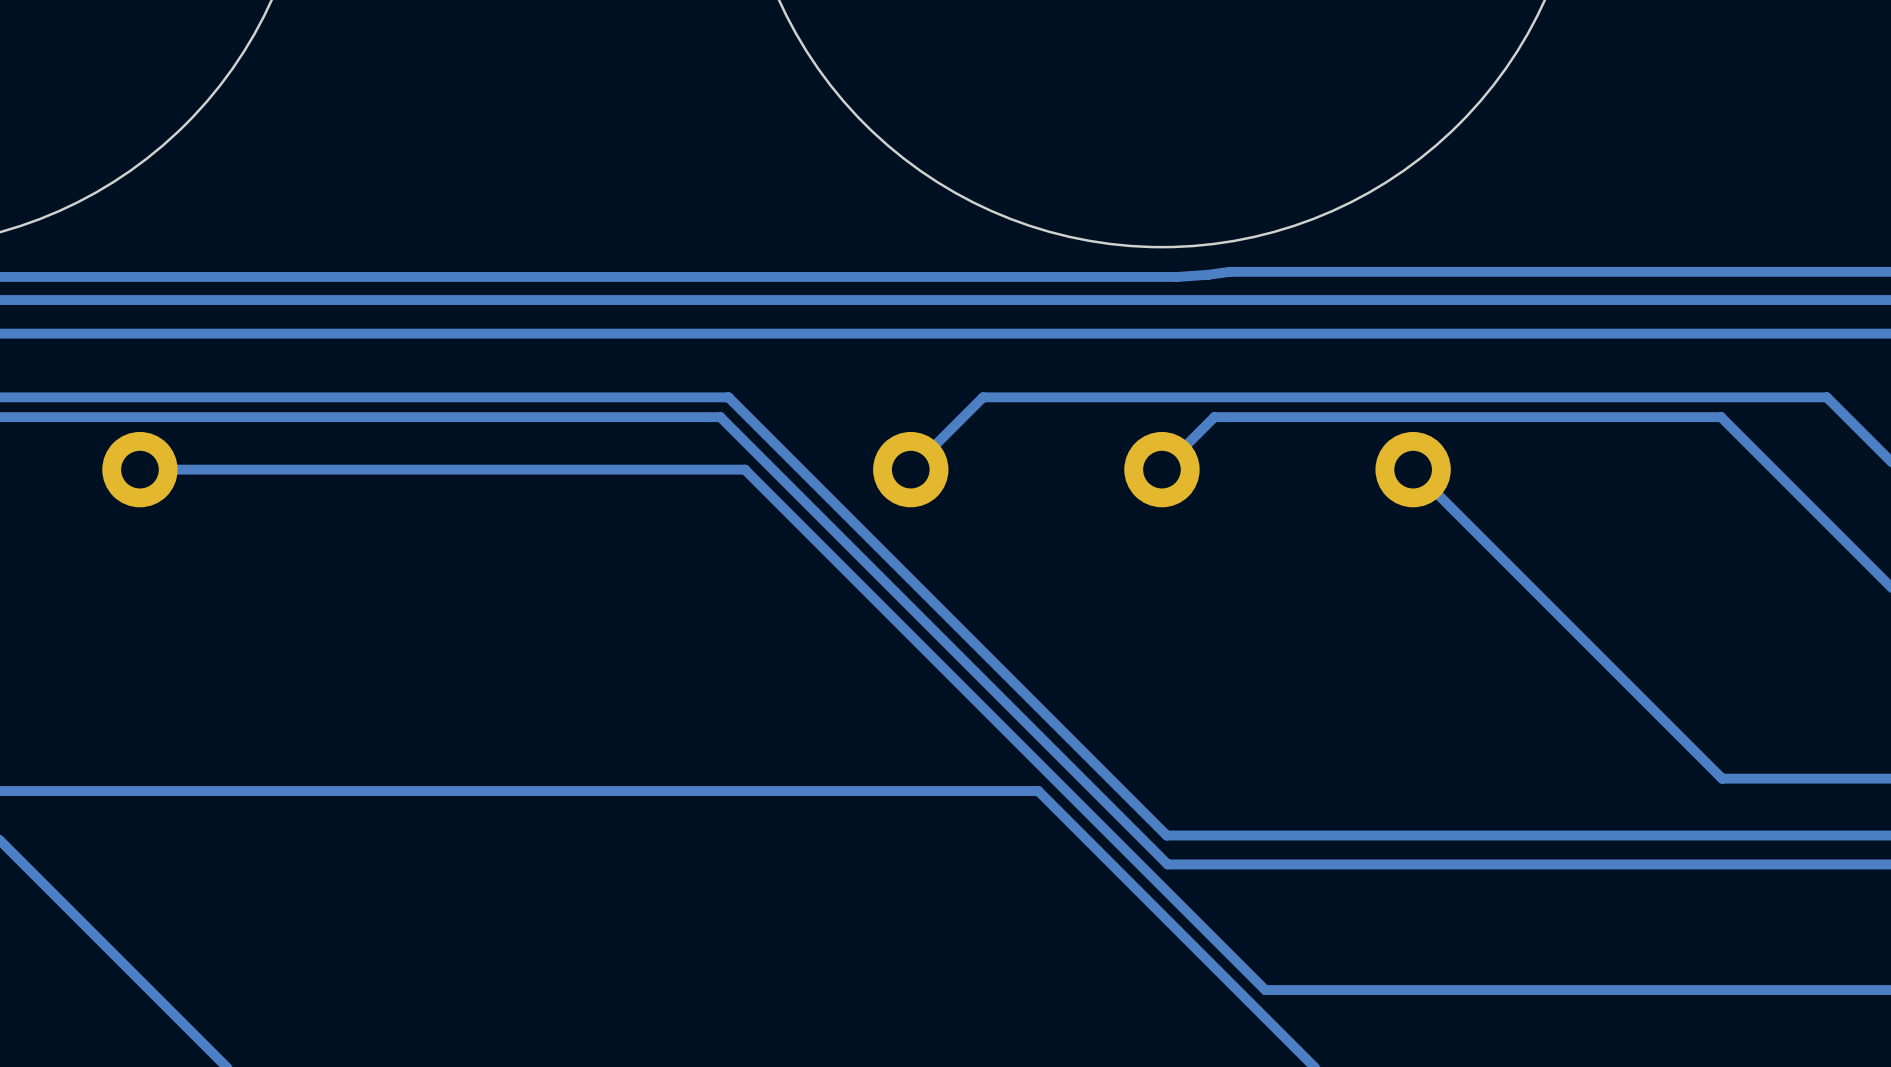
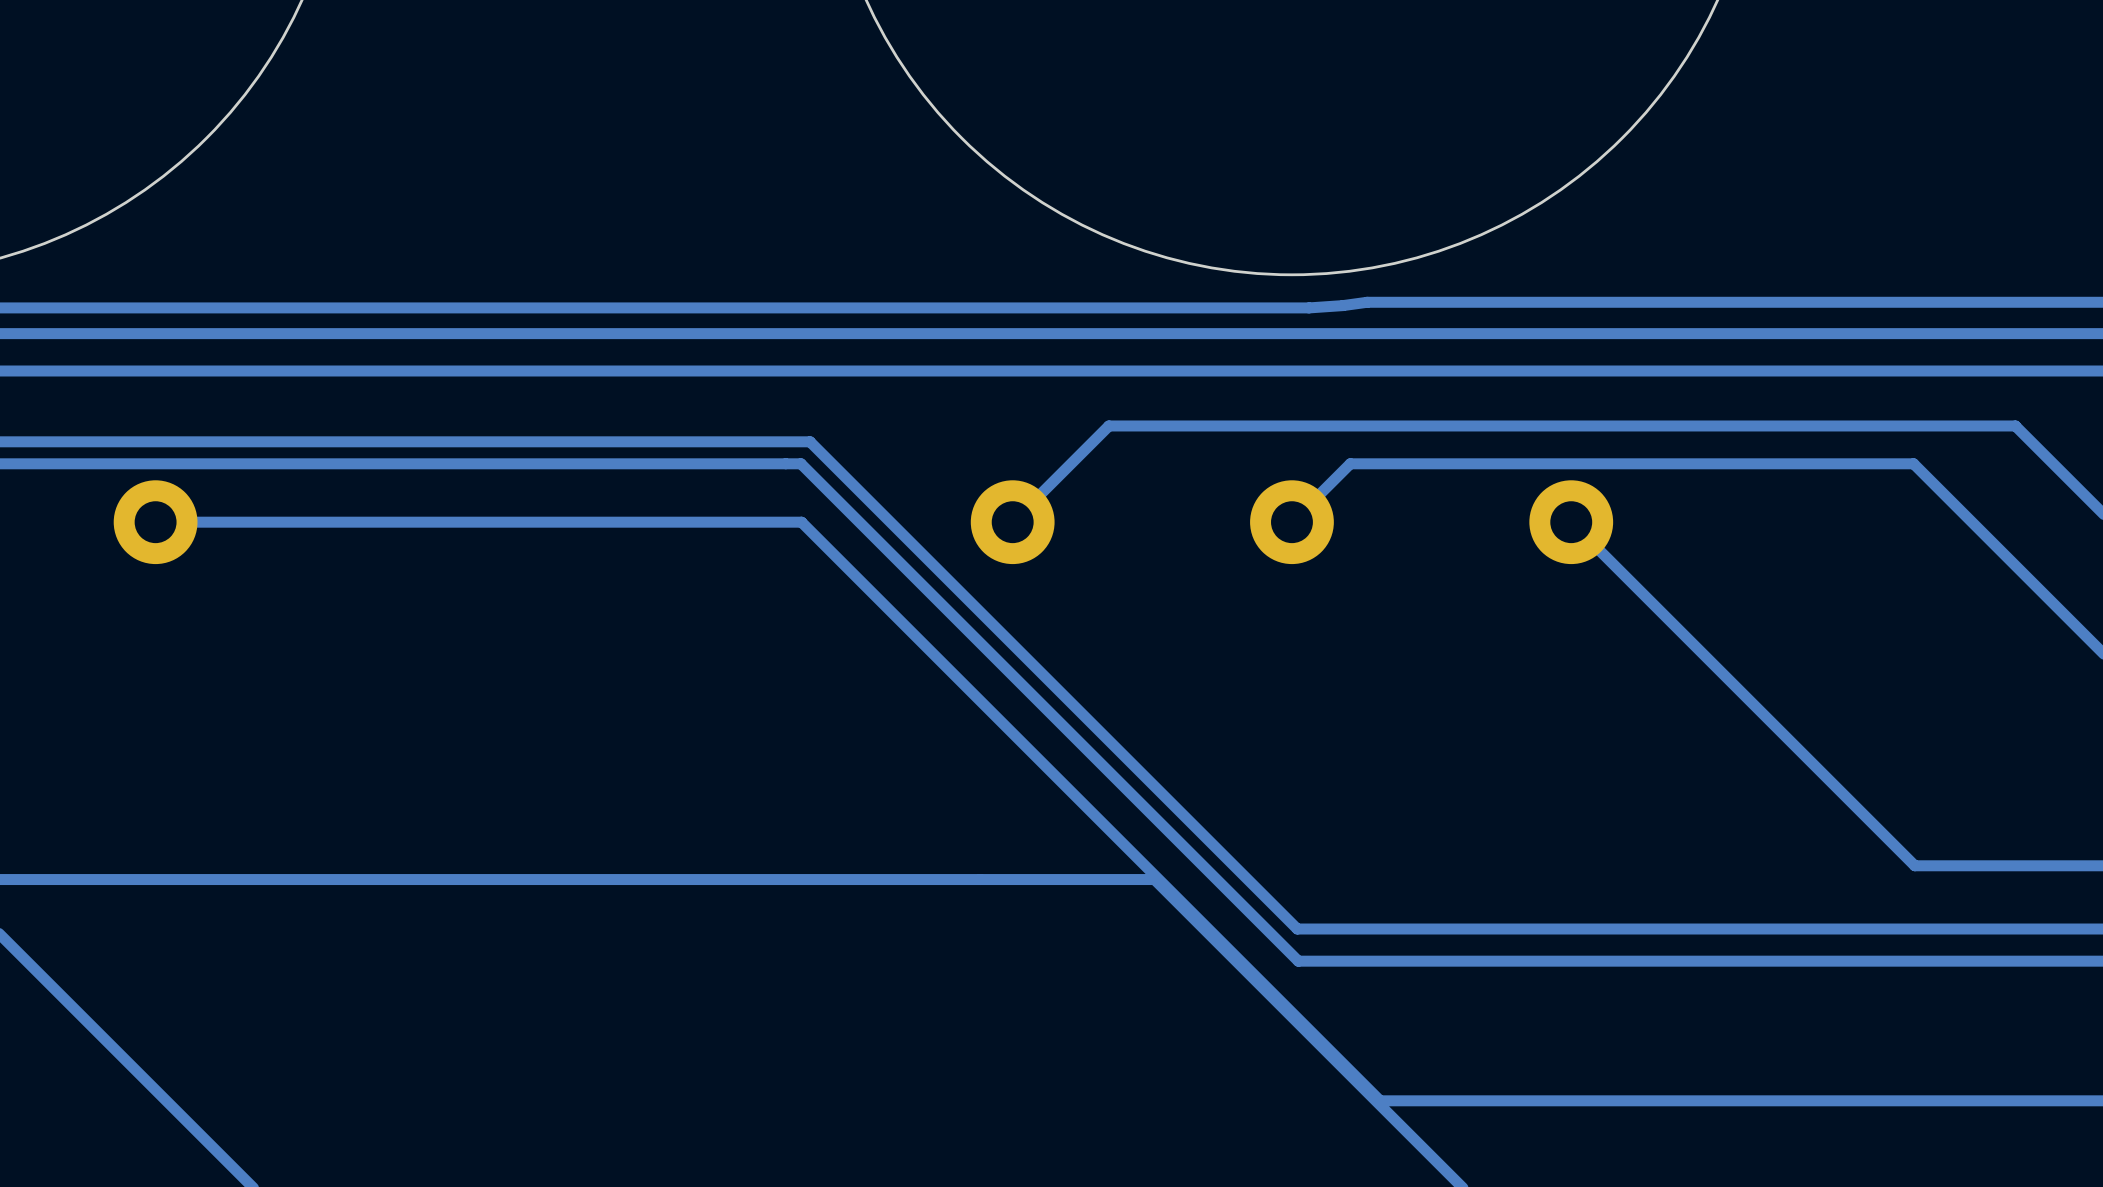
track: (1826, 397) (983, 397) -> (2031, 441) (2015, 425) (1108, 425) (1093, 441)
track: (720, 469) (744, 469) (1265, 990) -> (801, 522) (1380, 1100) (1406, 1100)

